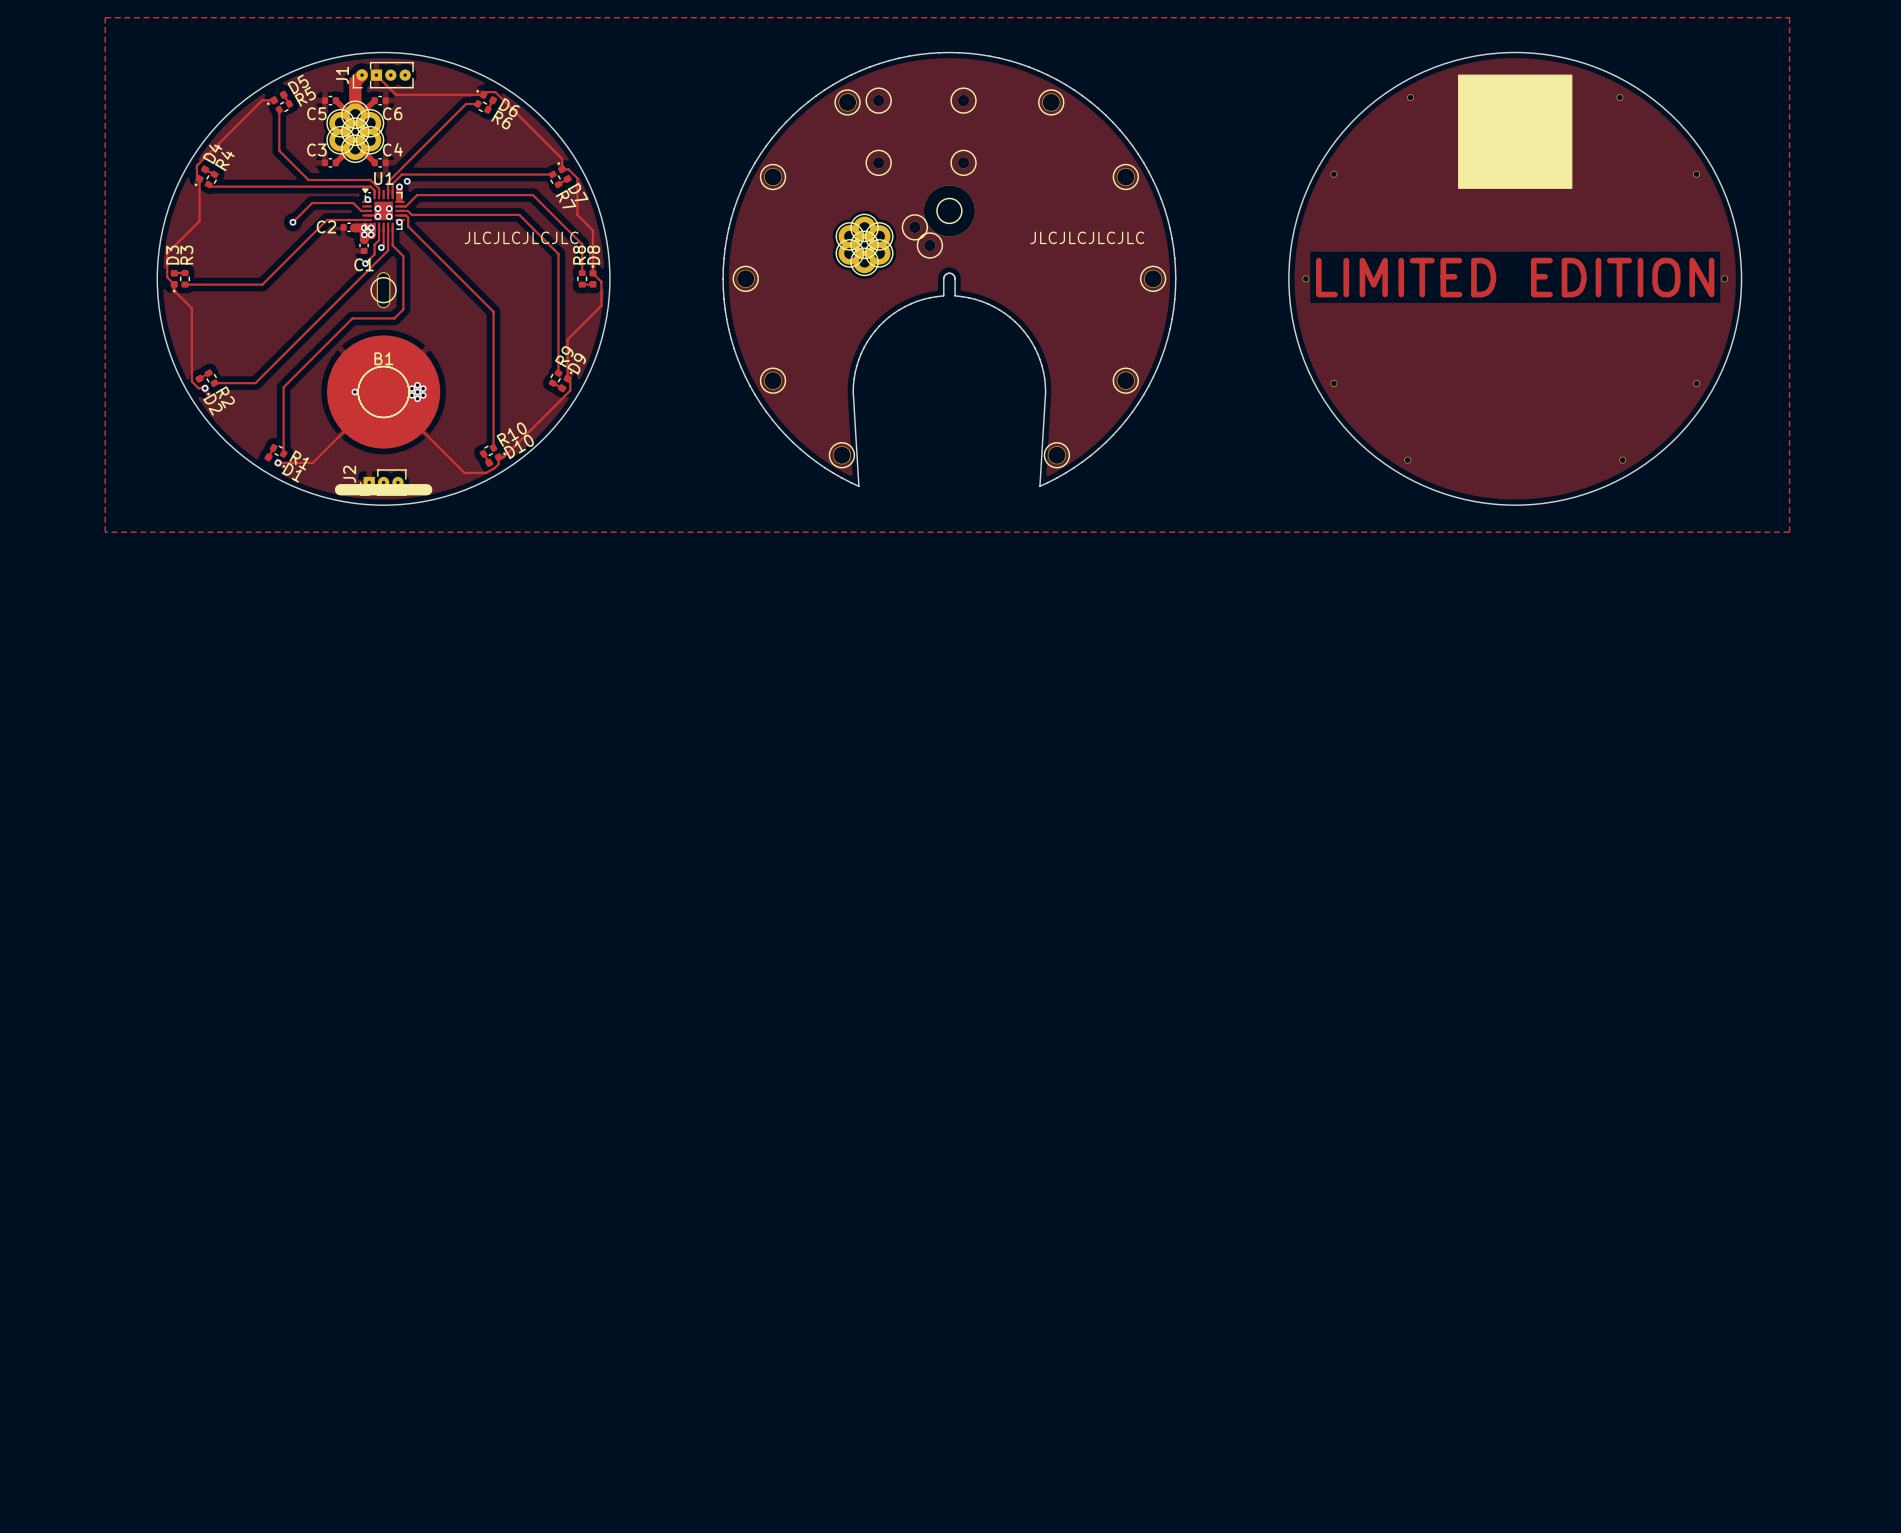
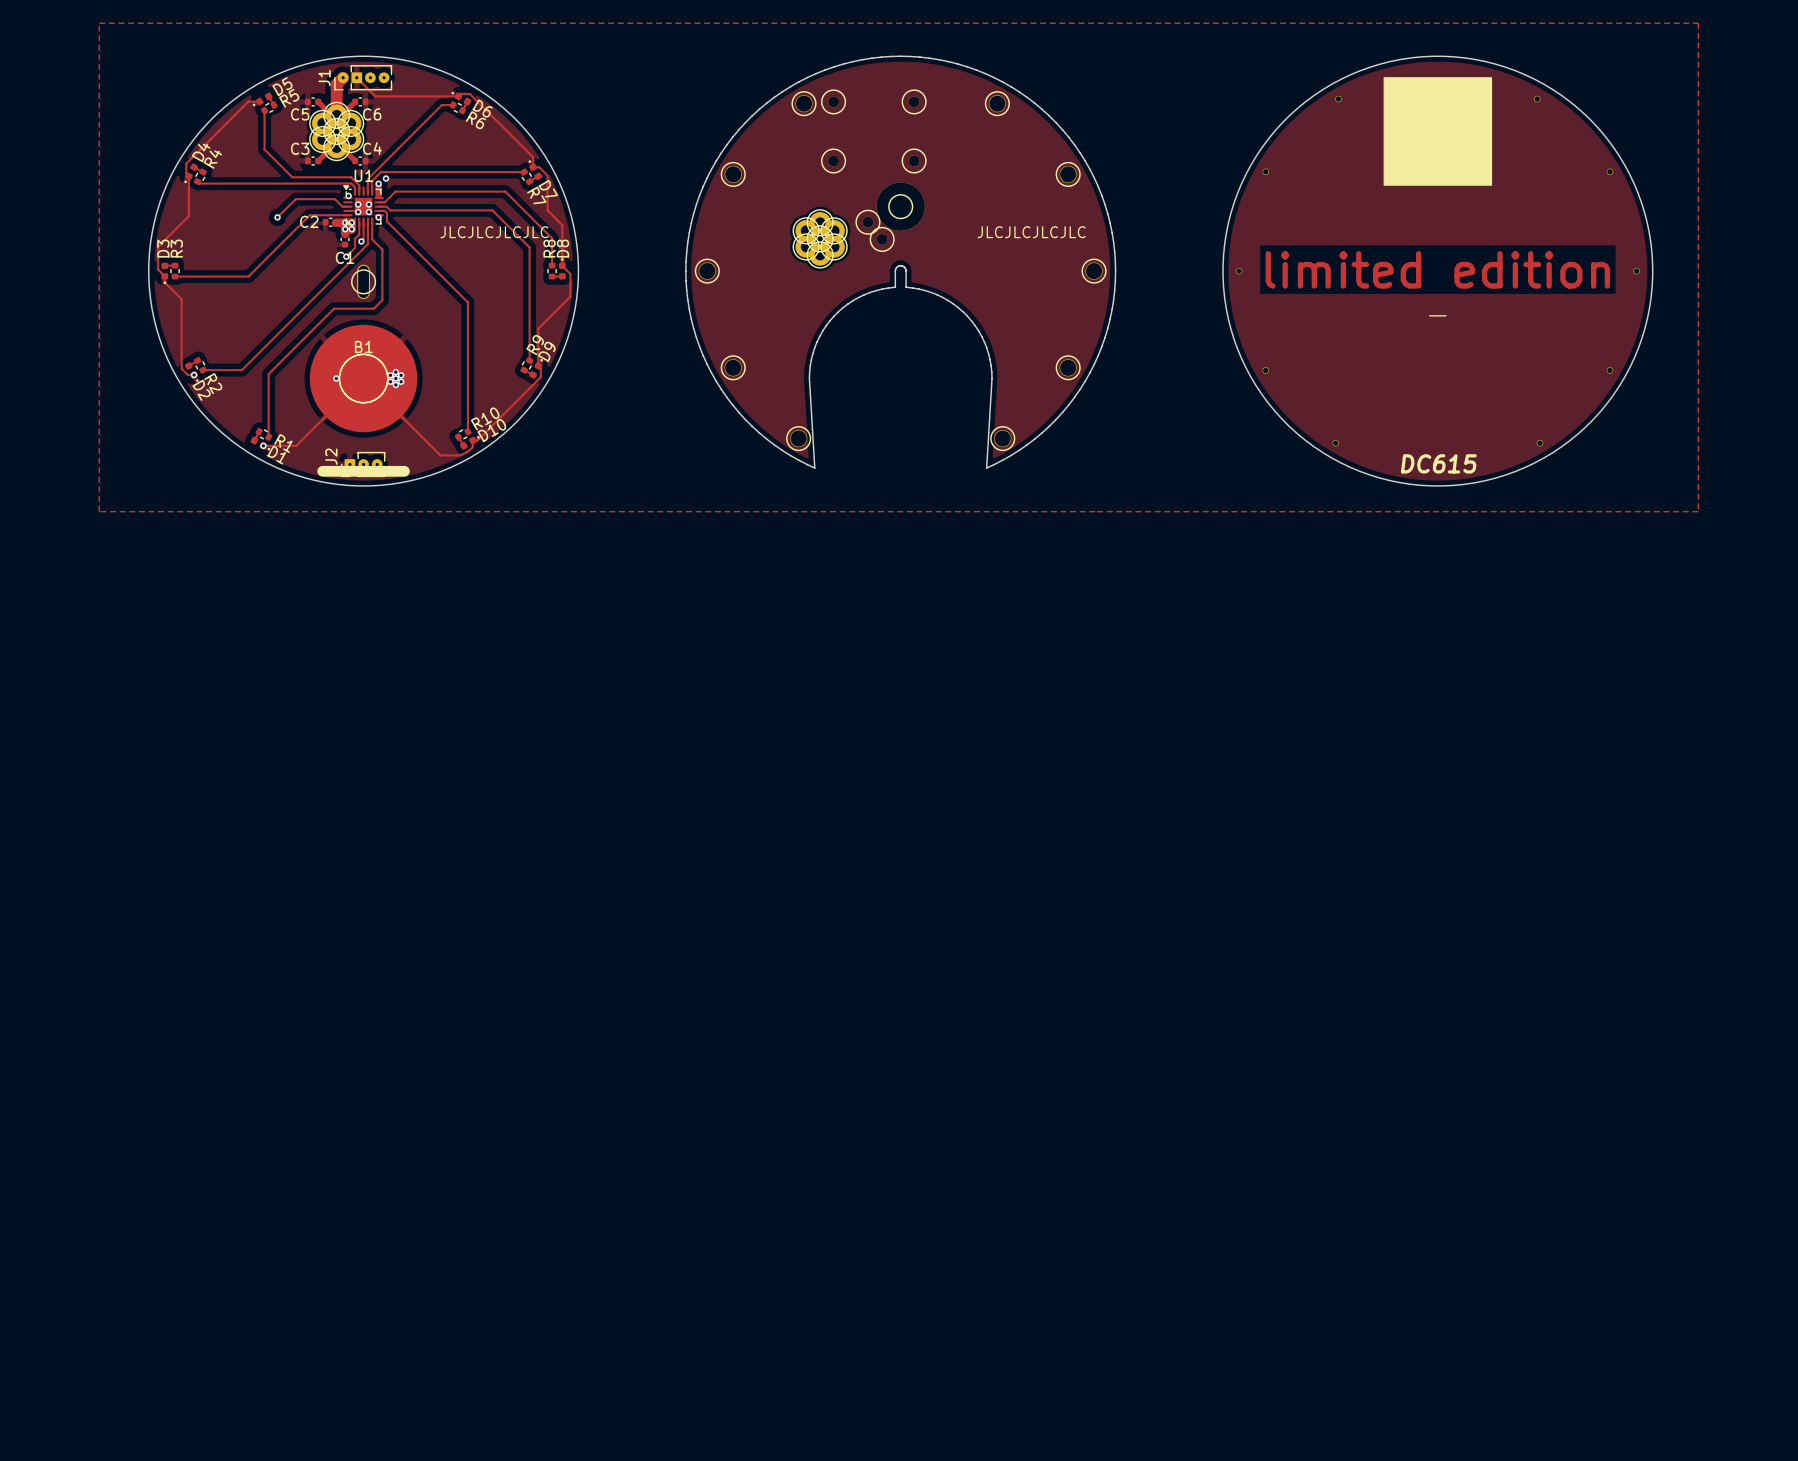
text: LIMITED EDITION (1515, 277) -> limited edition (1437, 269)
text: none -> - (1437, 315)
text: none -> DC615 (1438, 463)

